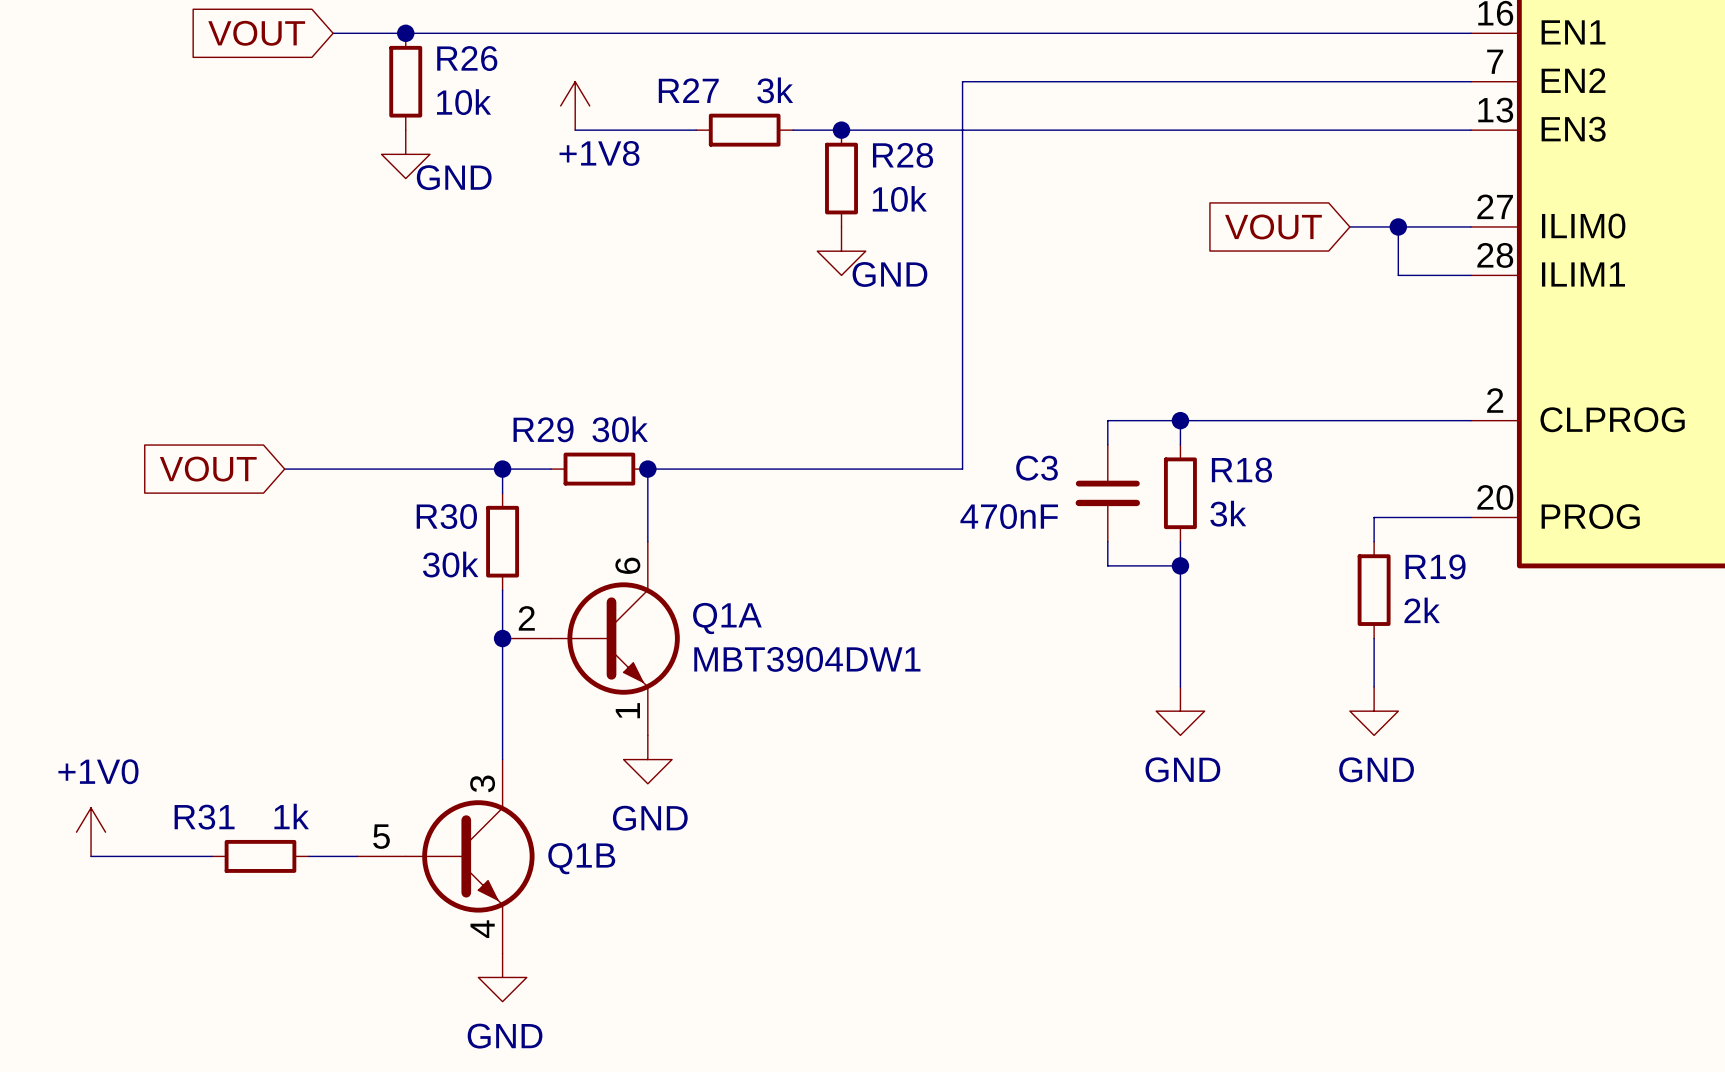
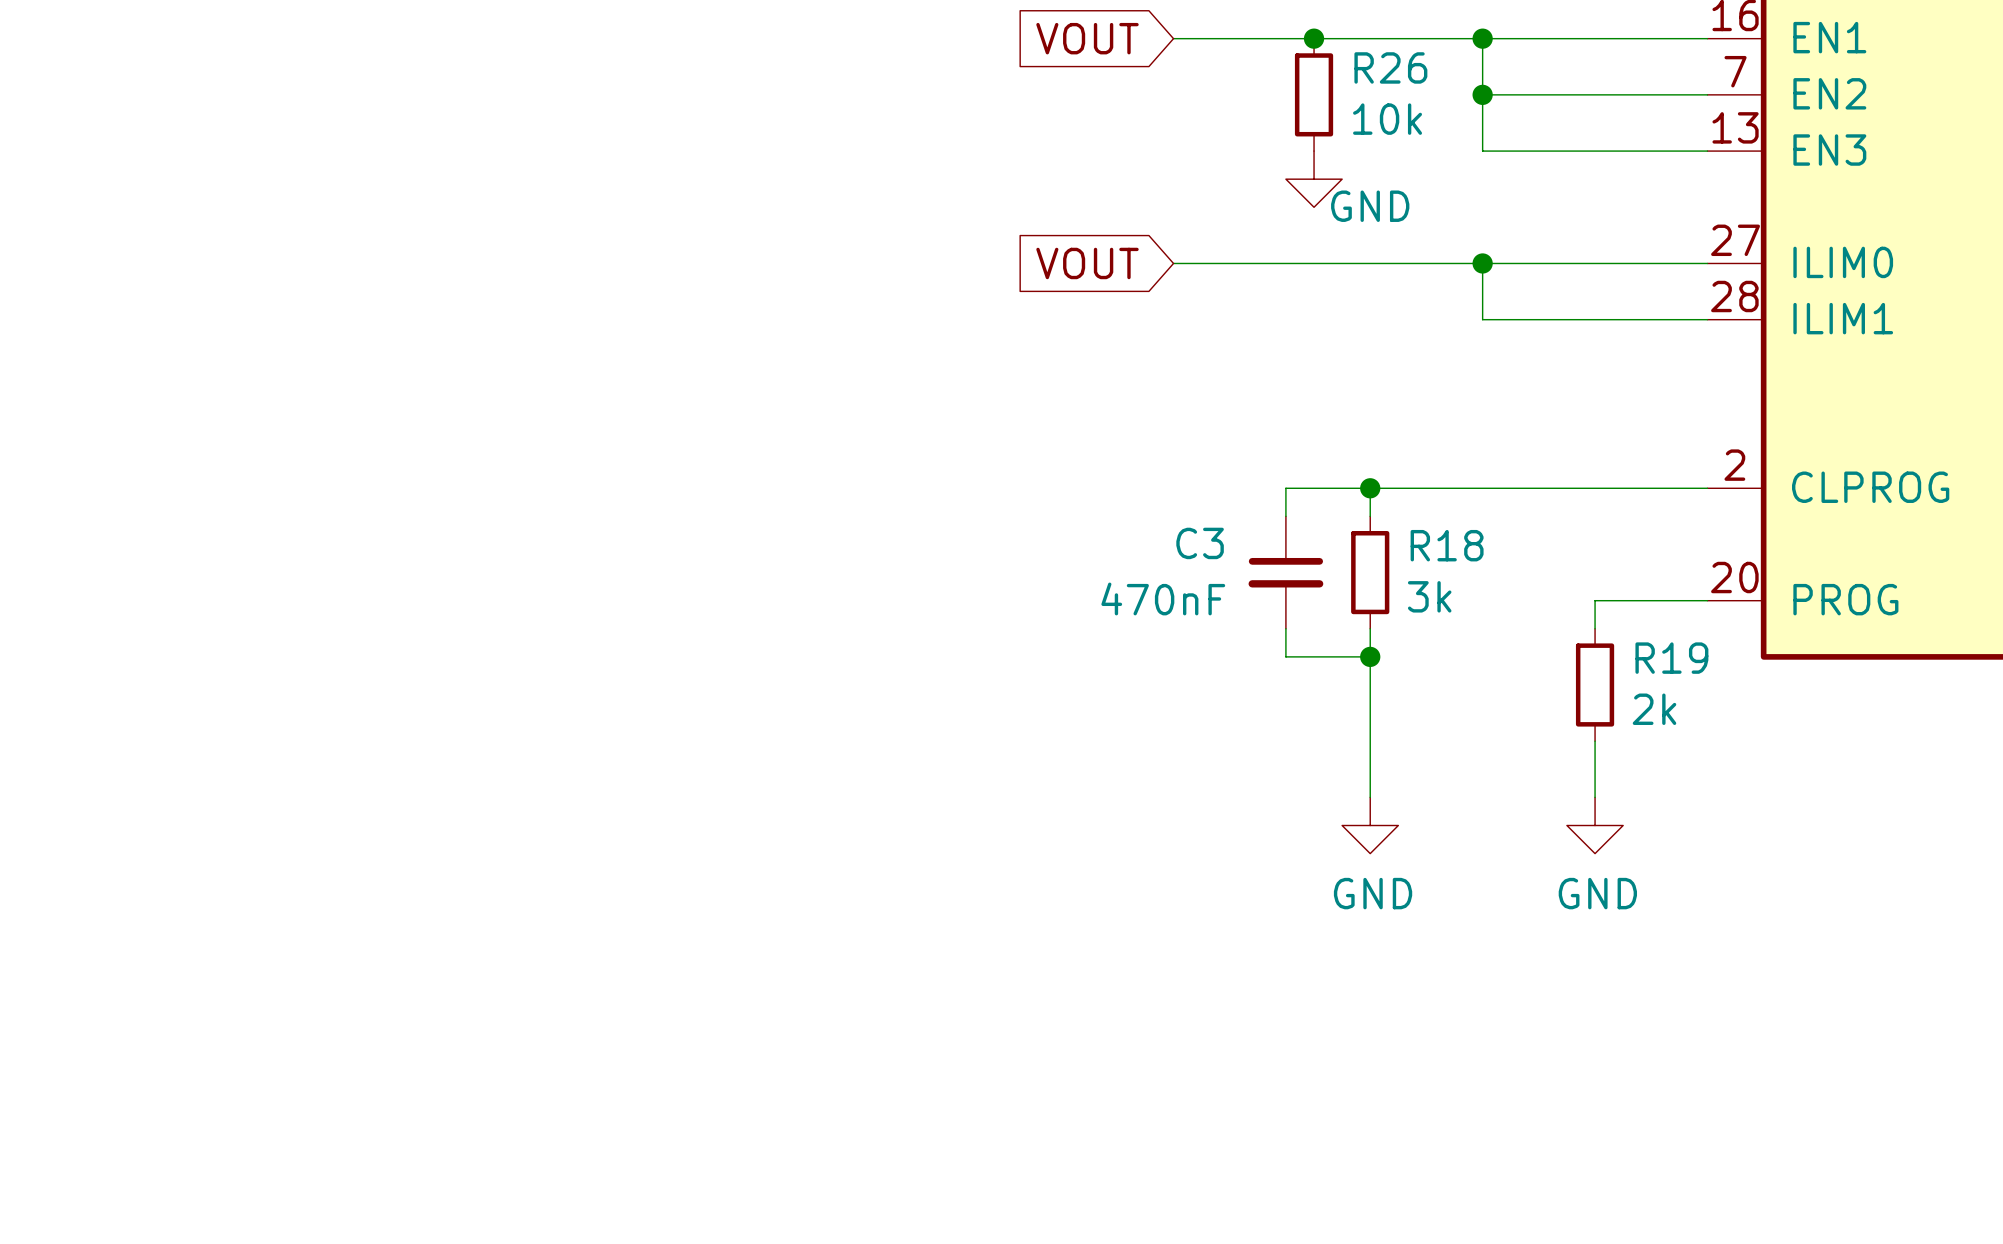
global label: VOUT (256, 33) -> none
wire: (333, 33) (1010, 33) -> none
junction: (405, 33) -> none
global label: none -> VOUT (1087, 38)
junction: none -> (1314, 38)
junction: none -> (1482, 38)
R26 position: (405, 81) -> (1314, 94)
wire: (1277, 81) (962, 81) (962, 469) (647, 469) (647, 541) -> none
junction: none -> (1482, 94)
power symbol: +1V8 (575, 105) -> none
wire: (575, 130) (696, 130) -> none
R27: 3k (744, 130) -> none
wire: (793, 130) (1277, 130) -> (1482, 38) (1482, 151)
junction: (841, 130) -> none
power symbol: GND (405, 154) -> none
R28: 10k (841, 178) -> none
global label: none -> VOUT (1087, 263)
wire: none -> (1173, 263) (1566, 263)
global label: VOUT (1273, 226) -> none
junction: none -> (1482, 263)
wire: (1398, 226) (1398, 275) -> (1482, 263) (1482, 319) (1623, 319)
junction: (1398, 226) -> none
power symbol position: GND (841, 251) -> GND (1314, 179)
global label: VOUT (208, 469) -> none
wire: (284, 469) (551, 469) -> none
wire: (502, 469) (502, 493) -> none
junction: (502, 469) -> none
R29: 30k (599, 469) -> none
junction: (647, 469) -> none
R30: 30k (502, 541) -> none
wire: (502, 590) (502, 759) -> none
junction: (502, 638) -> none
Q1A: MBT3904DW1 (591, 638) -> none
power symbol: GND (647, 759) -> none
power symbol: +1V0 (91, 832) -> none
wire: (91, 856) (212, 856) -> none
R31: 1k (260, 856) -> none
wire: (308, 856) (357, 856) -> none
Q1B: (445, 856) -> none
power symbol: GND (502, 977) -> none

